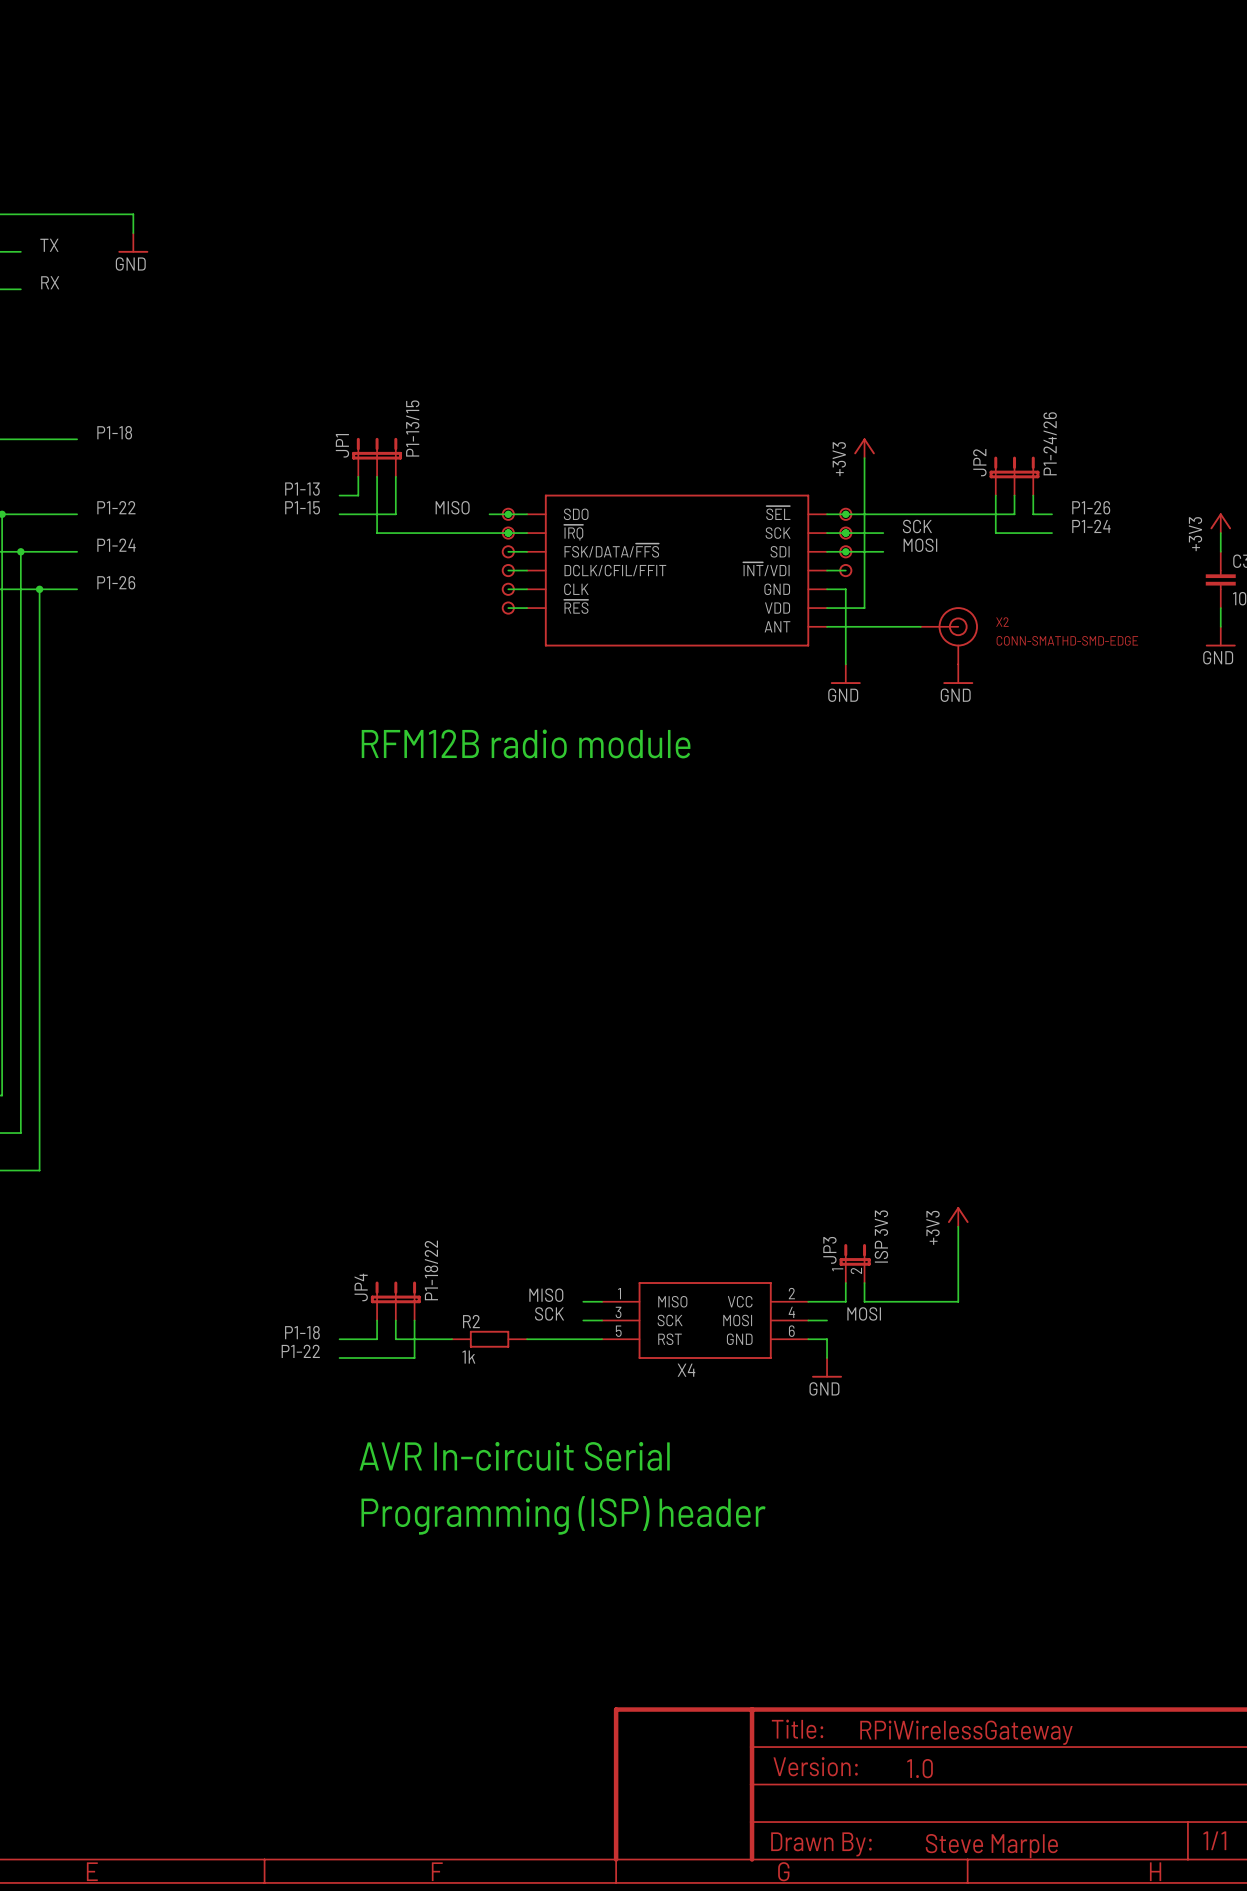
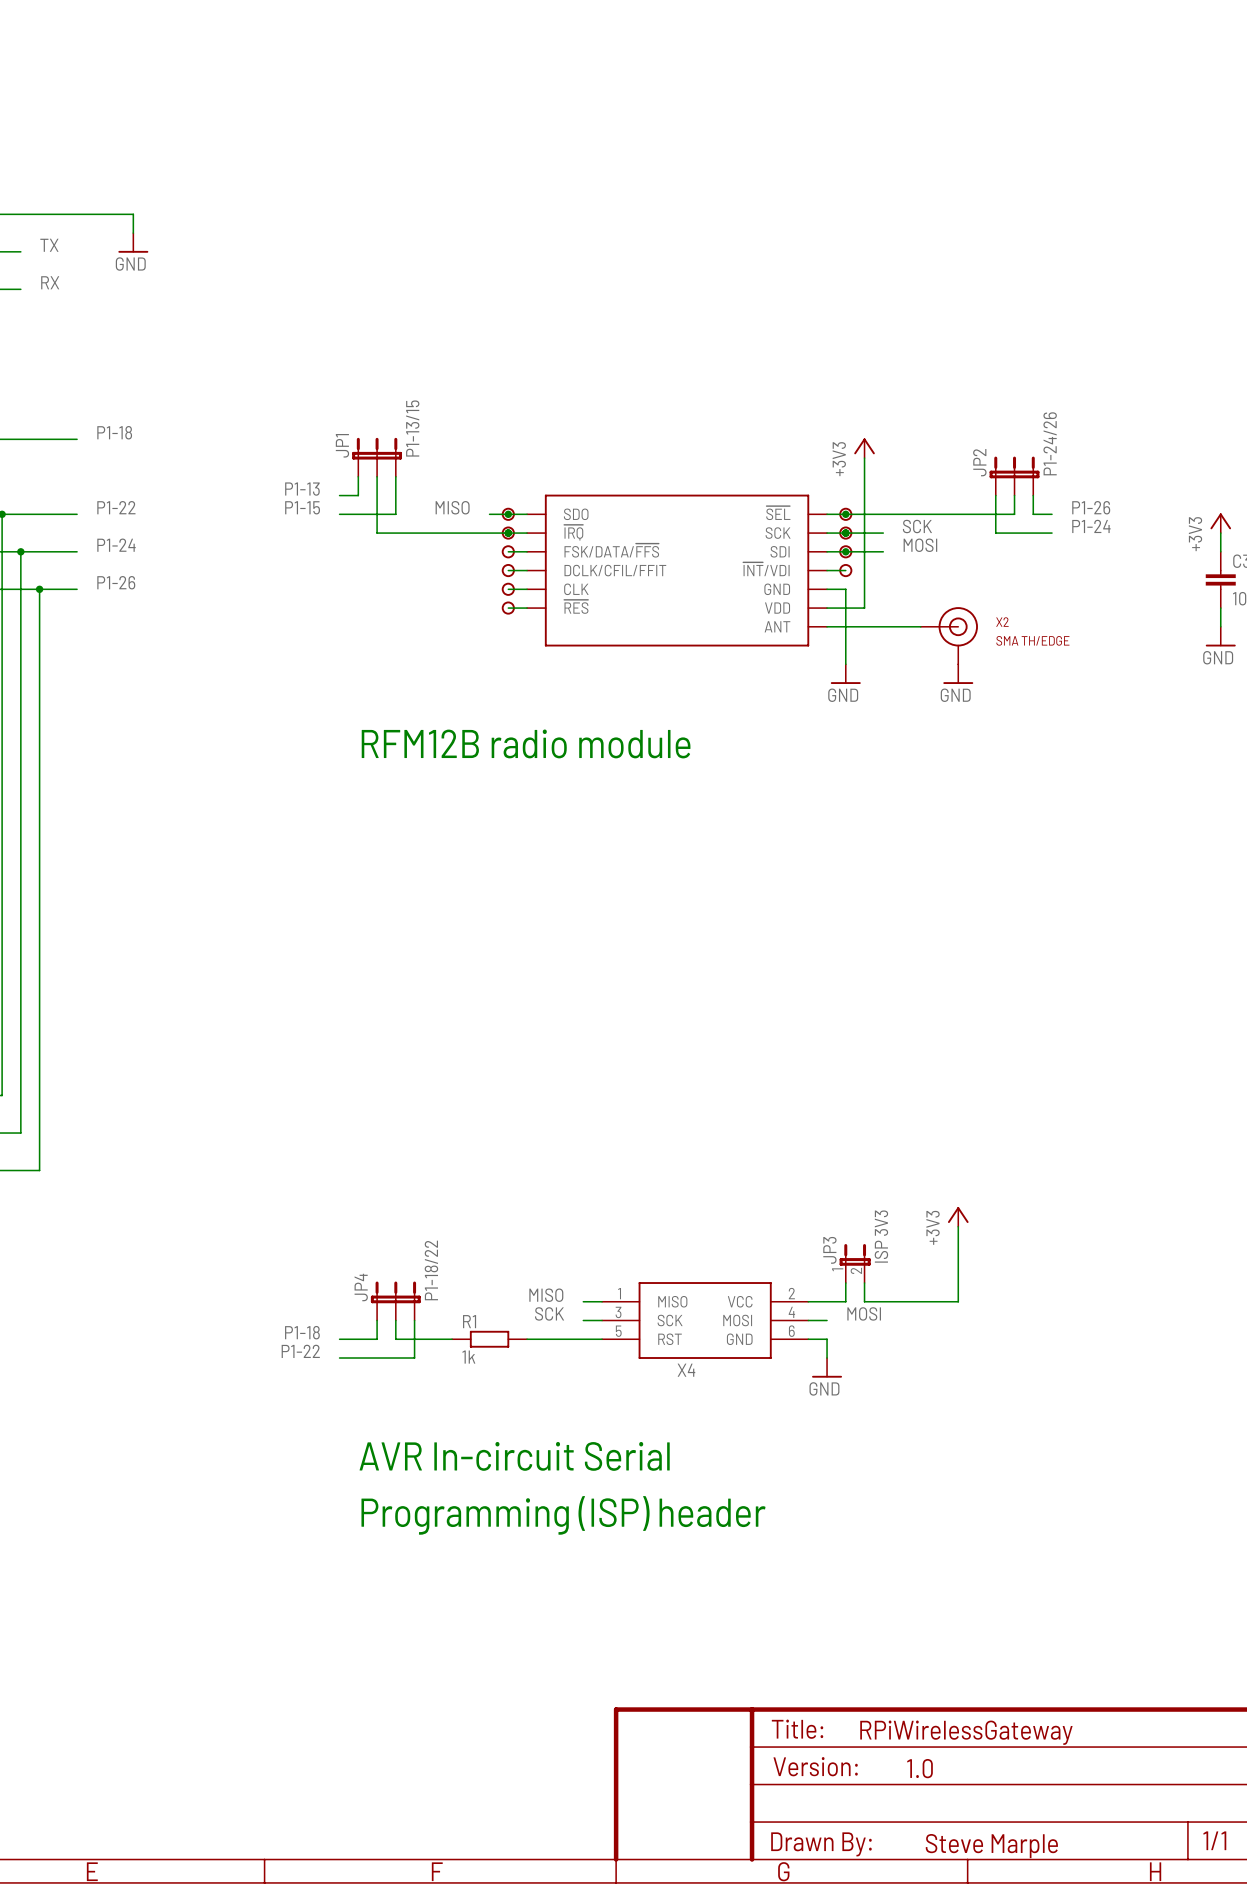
X2 value: CONN-SMATHD-SMD-EDGE (1067, 640) -> SMA TH/EDGE (1032, 640)
R2 name: R2 (471, 1321) -> R1 (469, 1321)

